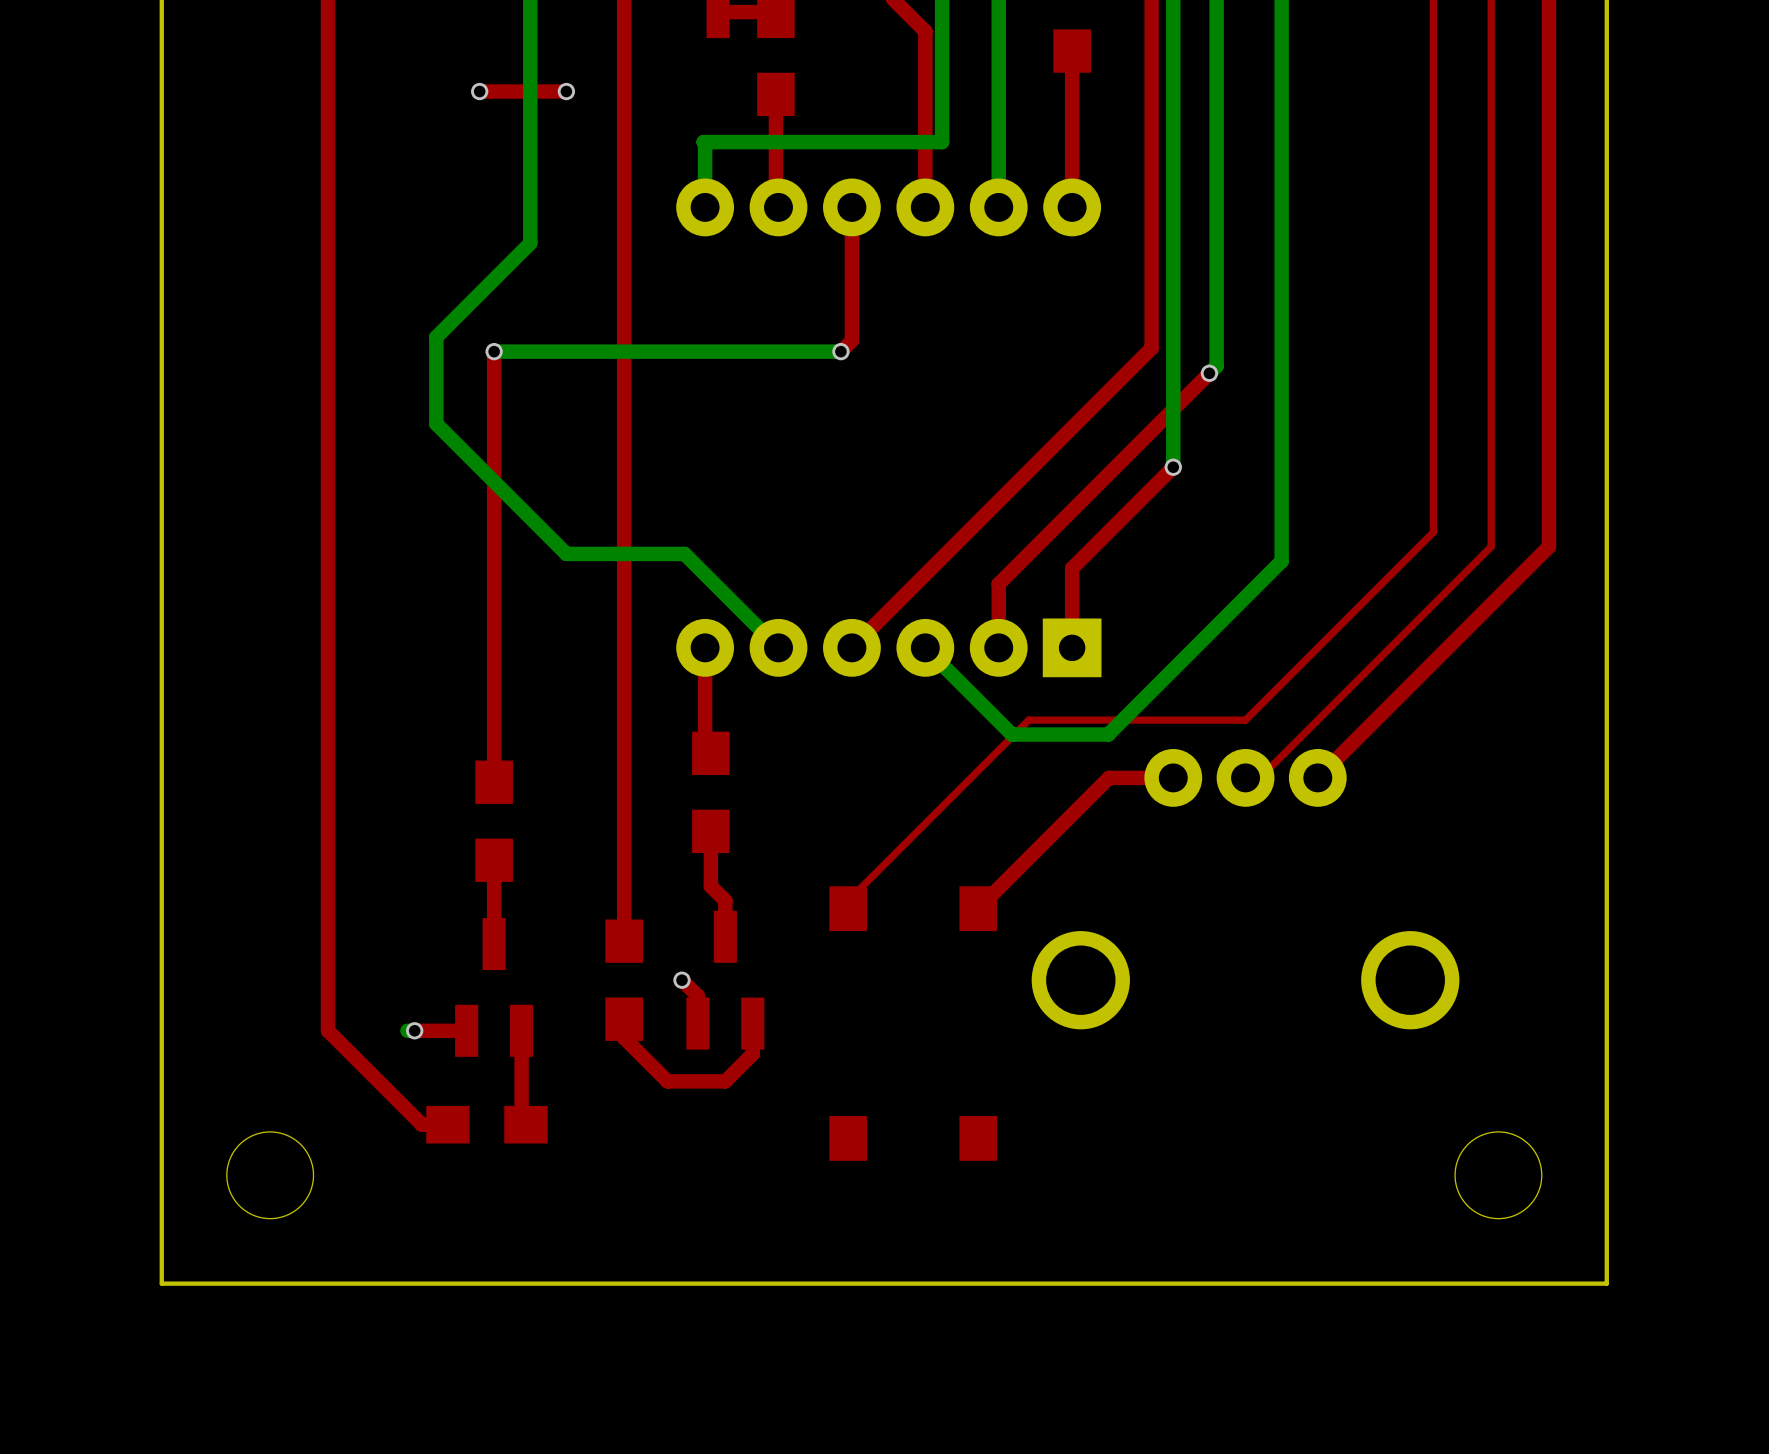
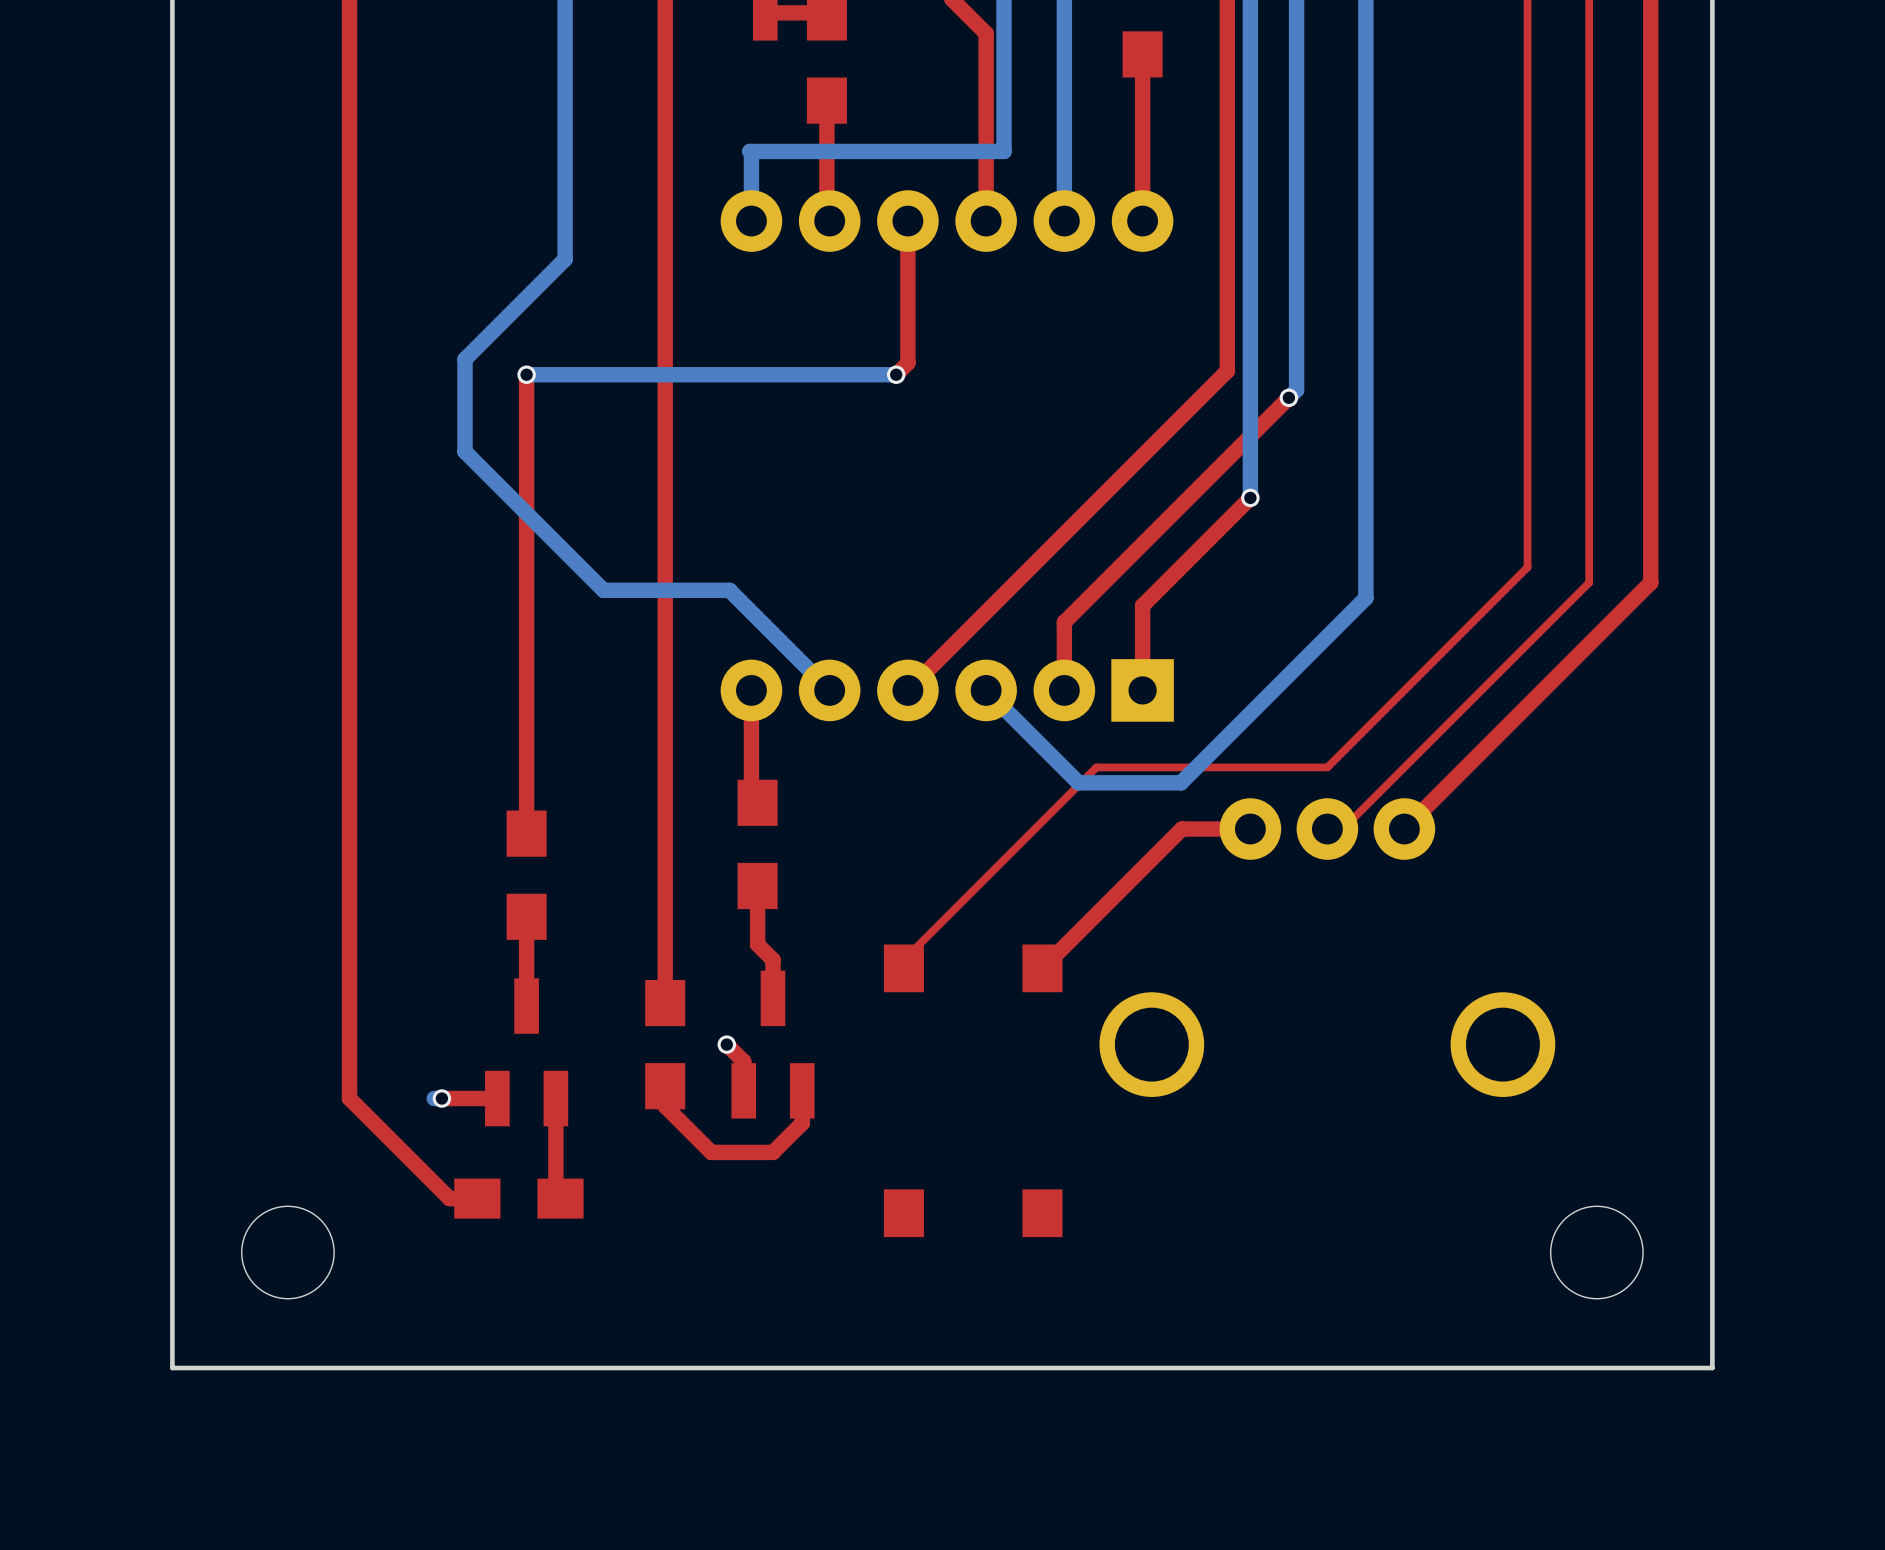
via: (479, 91) -> none
top track: (566, 91) (479, 91) -> none
via: (566, 91) -> none

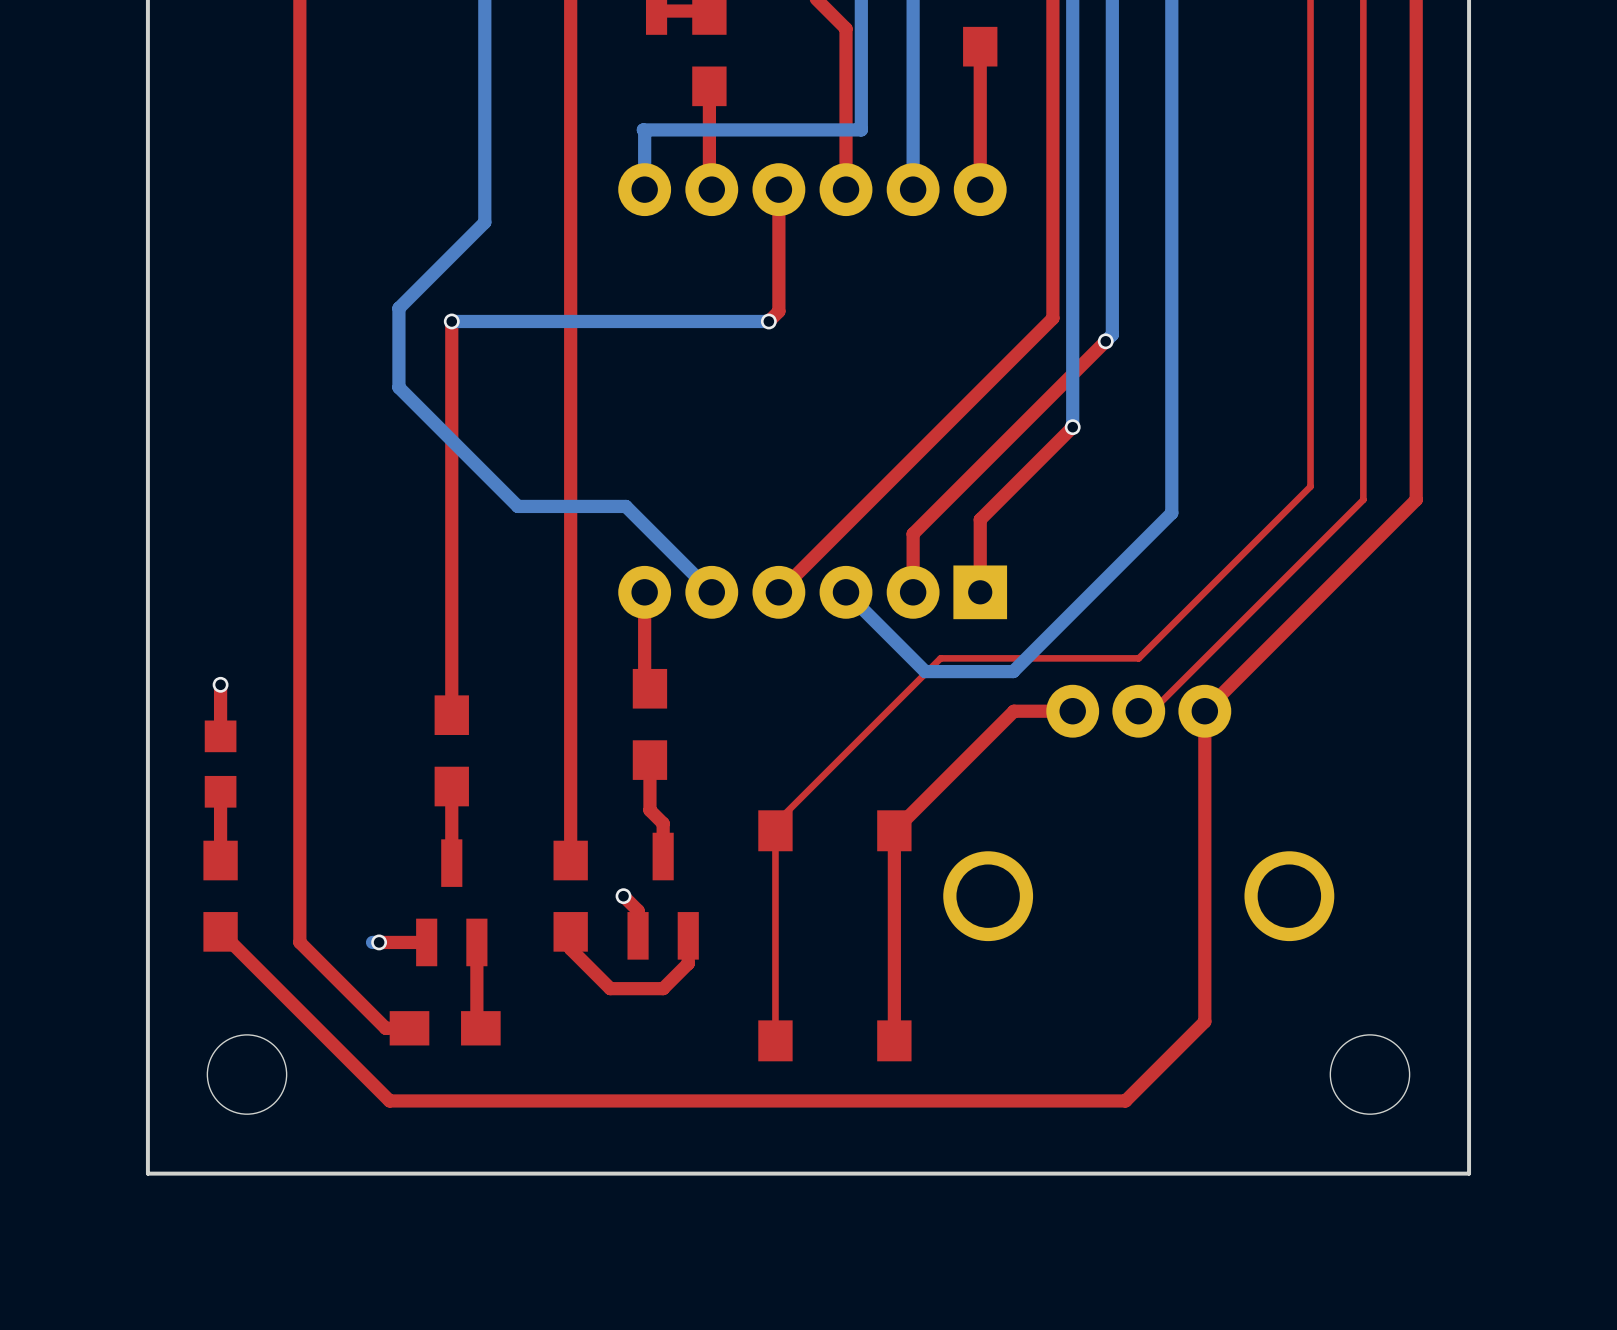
top track: none -> (220, 684) (220, 736)
via: none -> (220, 684)
top track: none -> (1204, 711) (1204, 1021) (1125, 1100) (389, 1100) (220, 931)
part: none -> (220, 764)
top track: none -> (220, 791) (220, 860)
top track: none -> (775, 830) (775, 1040)
top track: none -> (894, 830) (894, 1040)
part: none -> (220, 896)

